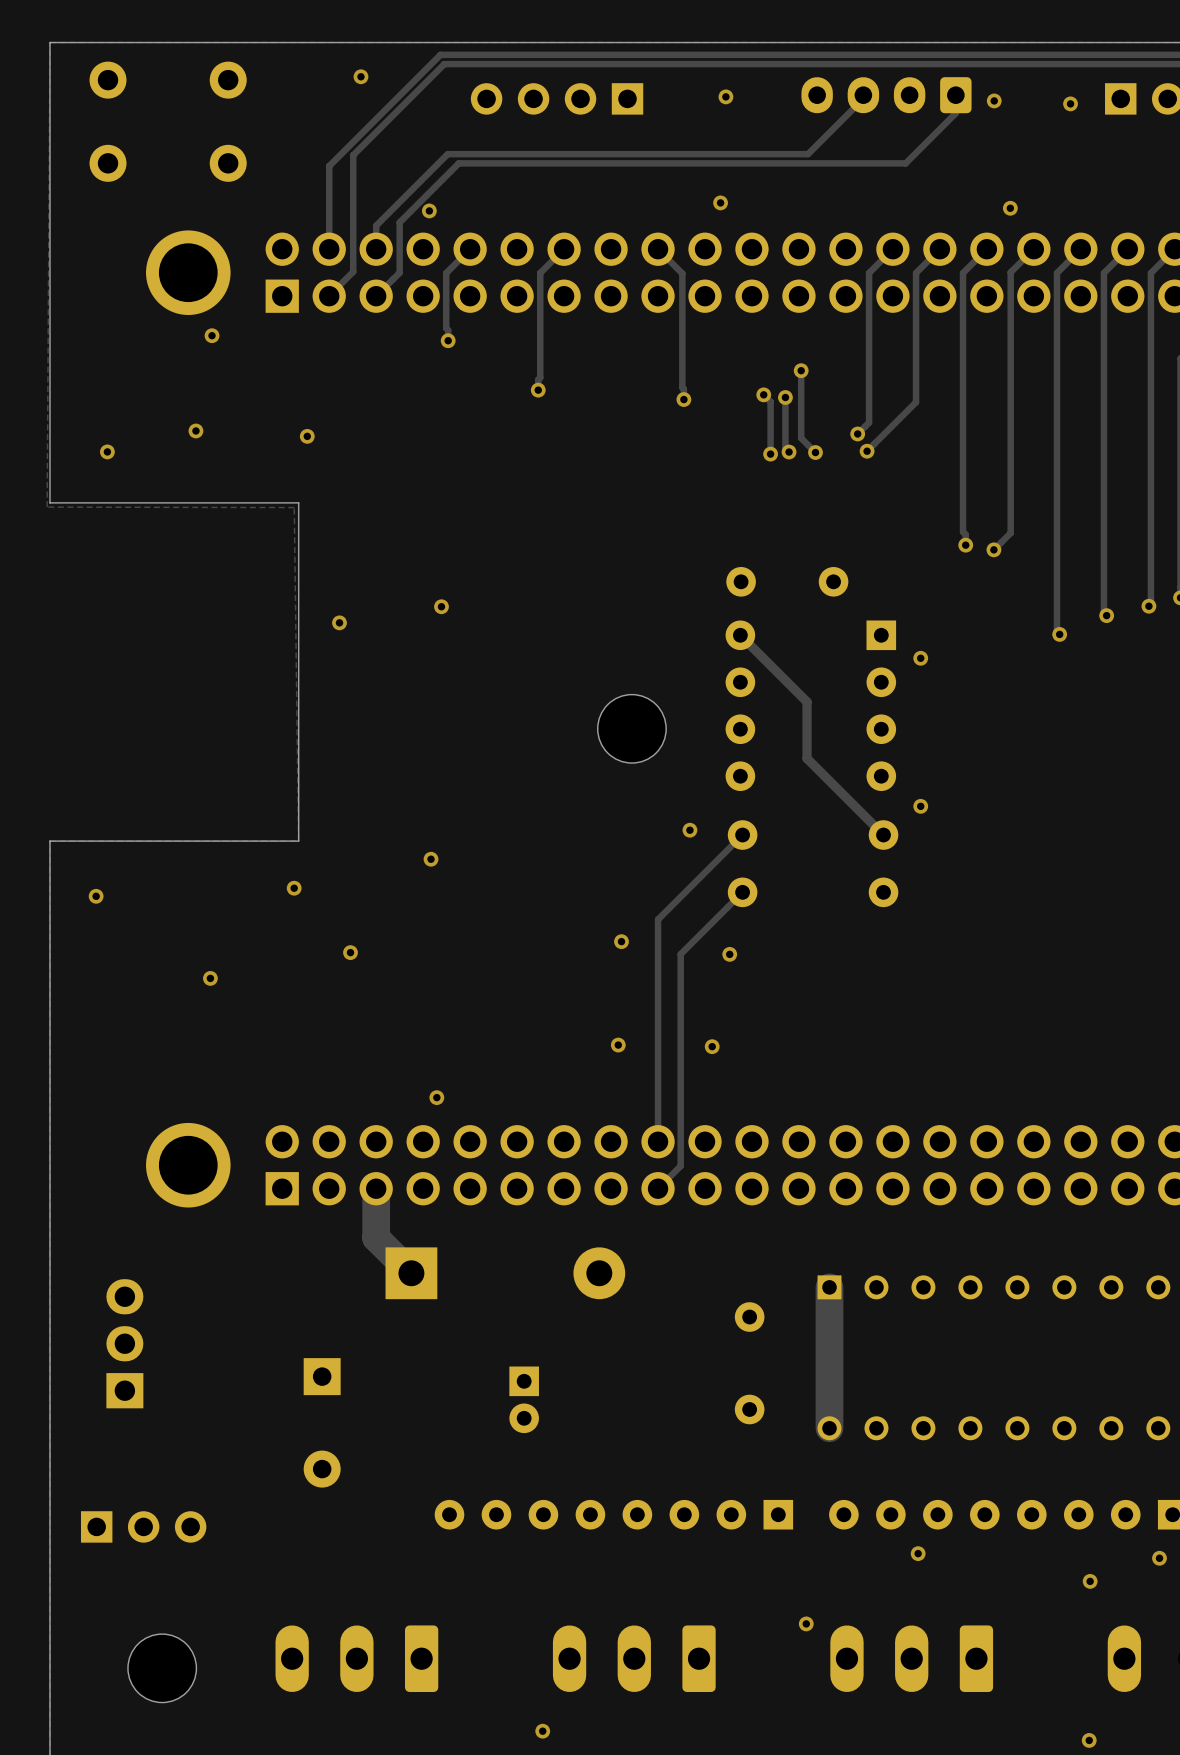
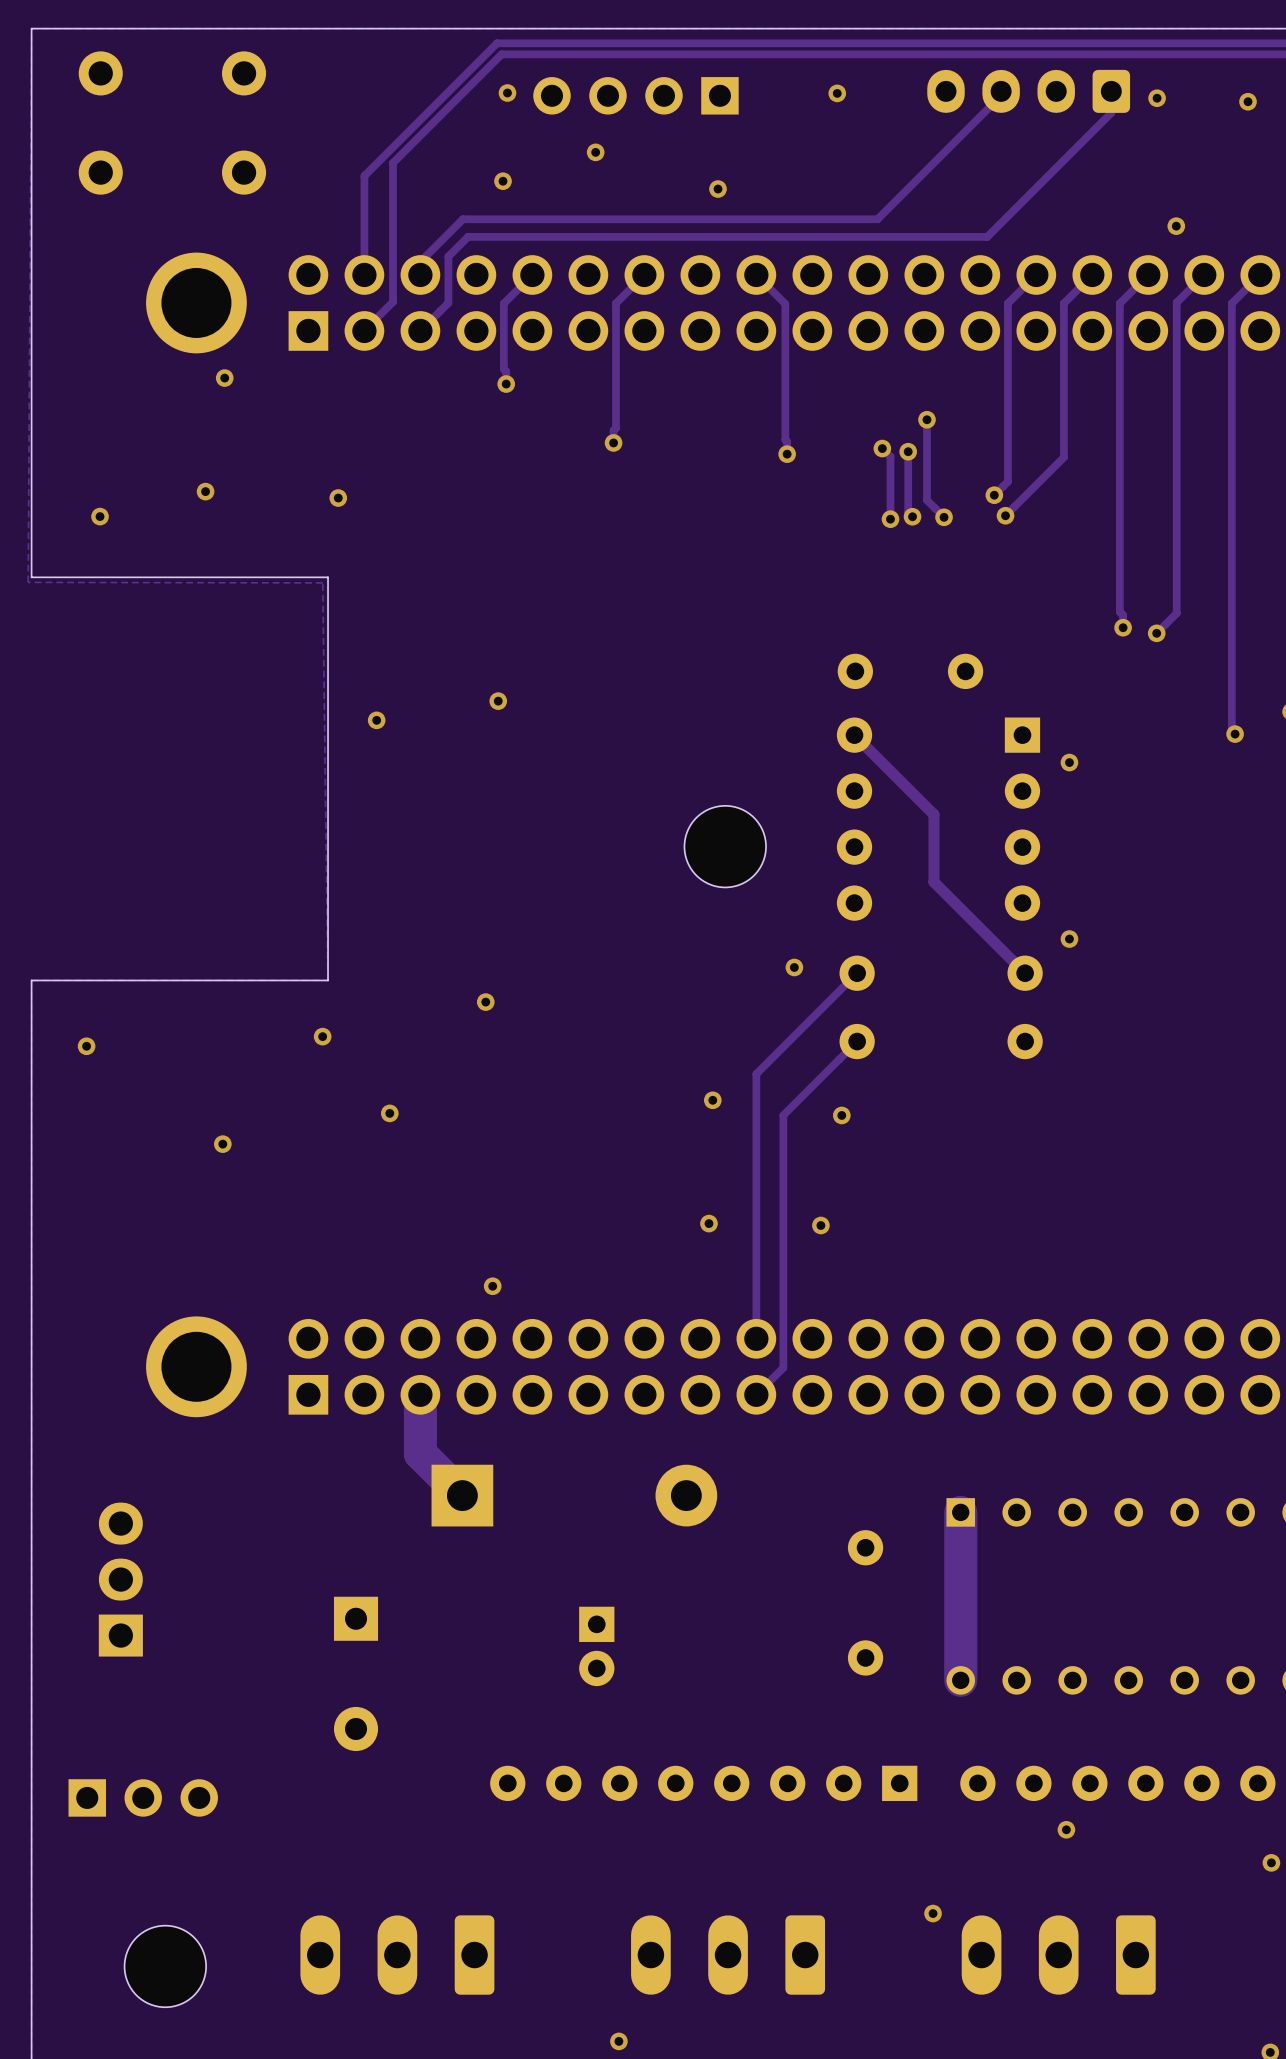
via: (360, 76) -> none
via: none -> (507, 93)
via: none -> (595, 152)
track: (808, 154) (447, 154) (376, 225) (376, 238) -> (935, 161) (877, 219) (462, 219) (420, 261)
track: (905, 163) (458, 163) (399, 222) (399, 233) -> (1051, 172) (987, 236) (468, 236) (448, 256)
via position: (720, 202) -> (718, 189)
via position: (429, 210) -> (503, 181)

